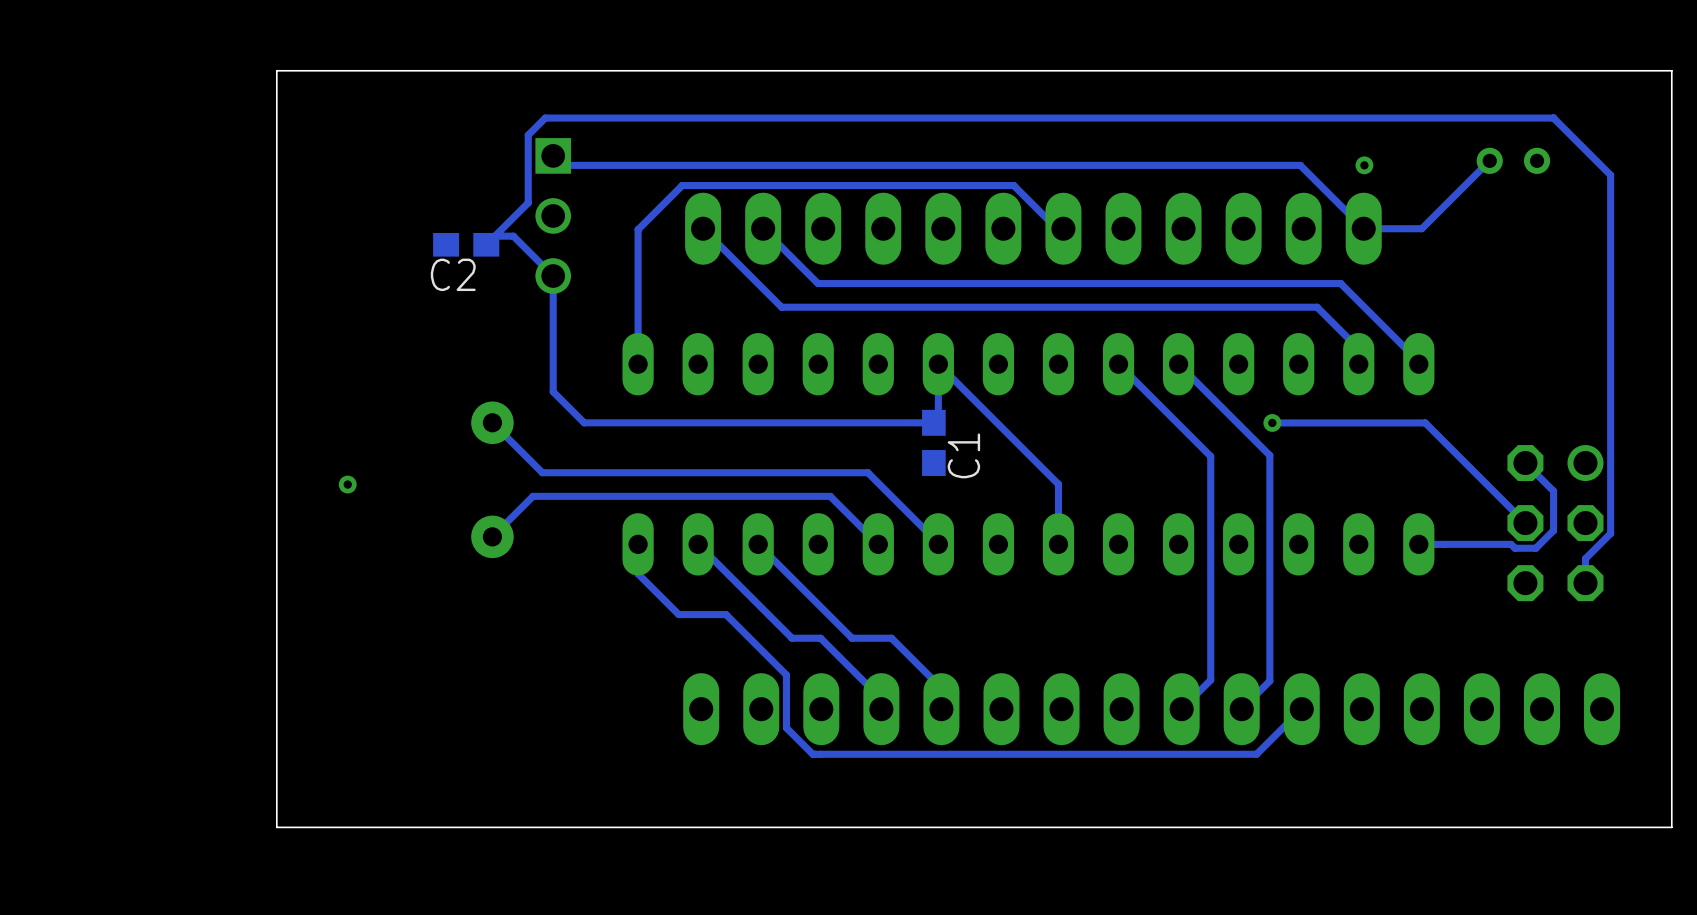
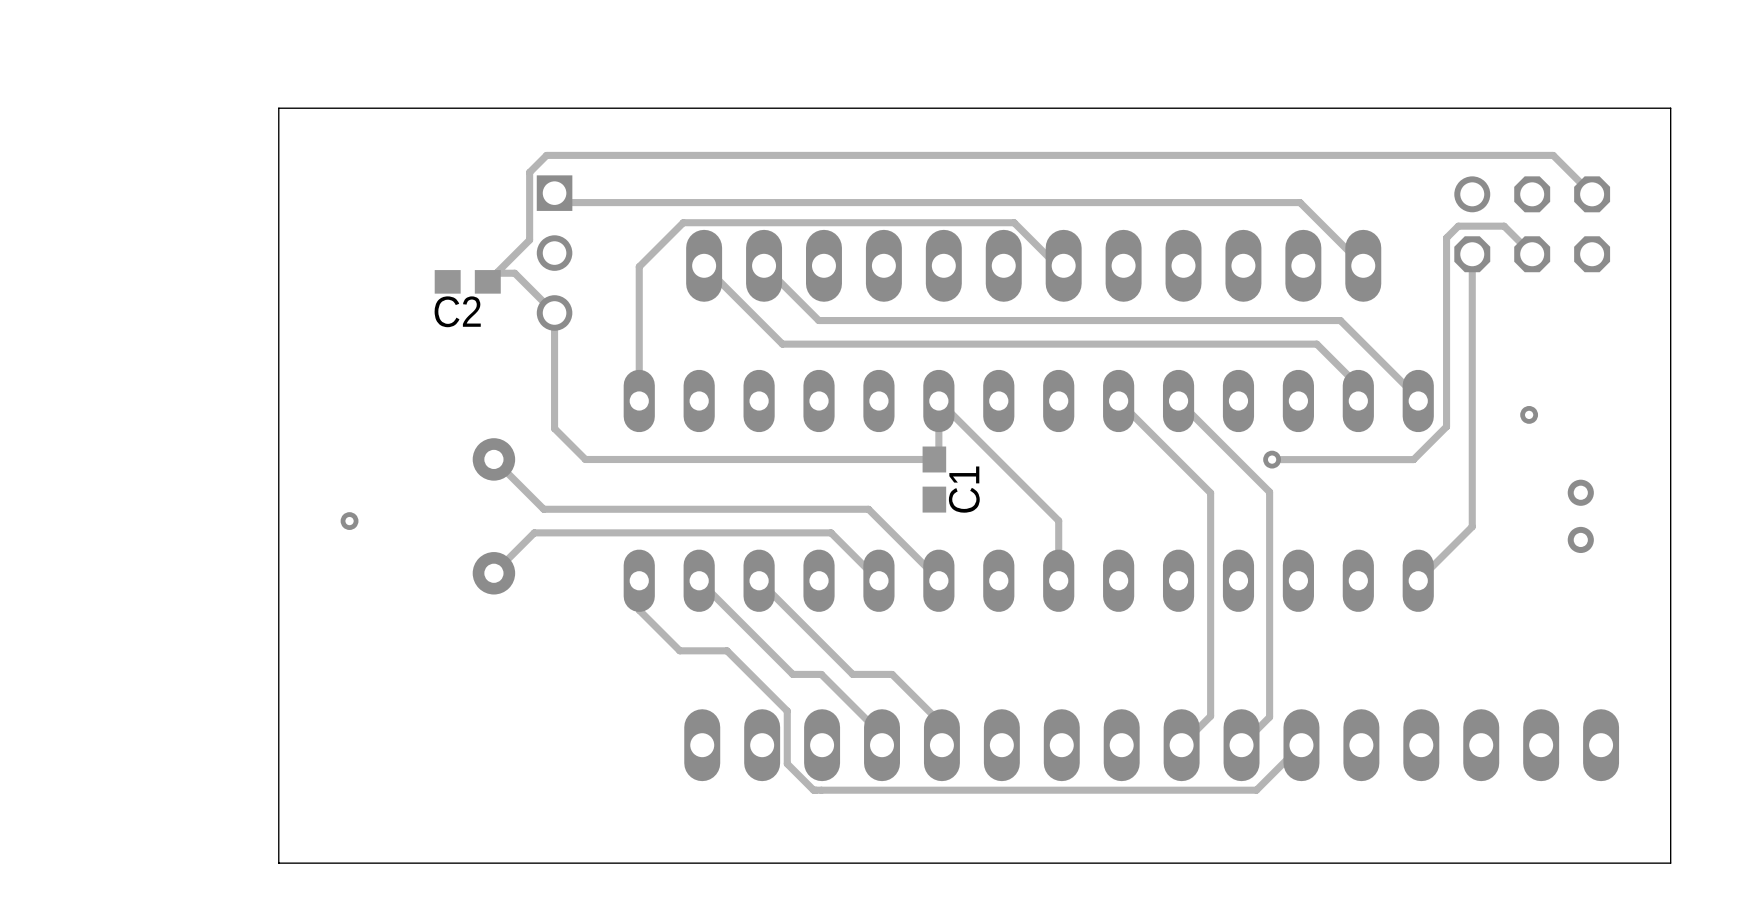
track: (1553, 118) (1610, 175) (1610, 533) (1585, 558) (1585, 583) -> (1553, 155) (1592, 194)
track: (1489, 160) (1421, 228) (1363, 228) -> none
part rotation: 0° (1513, 160) -> 90° clockwise (1580, 516)
part position: (1513, 160) -> (1580, 516)
via: (1364, 165) -> none
via: none -> (1529, 414)
track: (1414, 422) (1425, 422) (1525, 523) -> (1413, 459) (1446, 426) (1446, 237) (1458, 226) (1504, 226) (1532, 254)
track: (1525, 463) (1553, 491) (1553, 530) (1535, 548) (1515, 548) (1511, 544) (1418, 544) -> (1472, 254) (1472, 526) (1418, 580)
part rotation: 0° (1555, 523) -> 90° counterclockwise (1532, 224)
part position: (1555, 523) -> (1532, 224)

